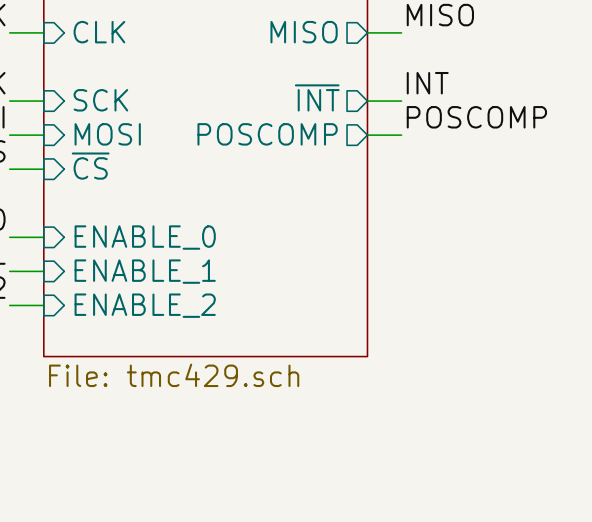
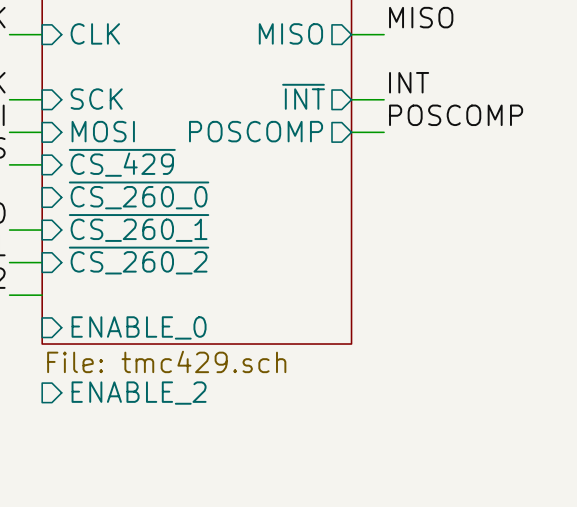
sheet pin: ~{CS} (90, 166) -> ~{CS_429} (122, 162)
sheet pin: none -> ~{CS_260_0} (139, 195)
sheet pin: ENABLE_0 (145, 237) -> ~{CS_260_1} (139, 227)
sheet pin: ENABLE_1 (145, 271) -> ~{CS_260_2} (139, 260)
sheet pin position: ENABLE_2 (145, 305) -> ENABLE_2 (139, 393)
sheet pin: none -> ENABLE_0 (139, 327)

